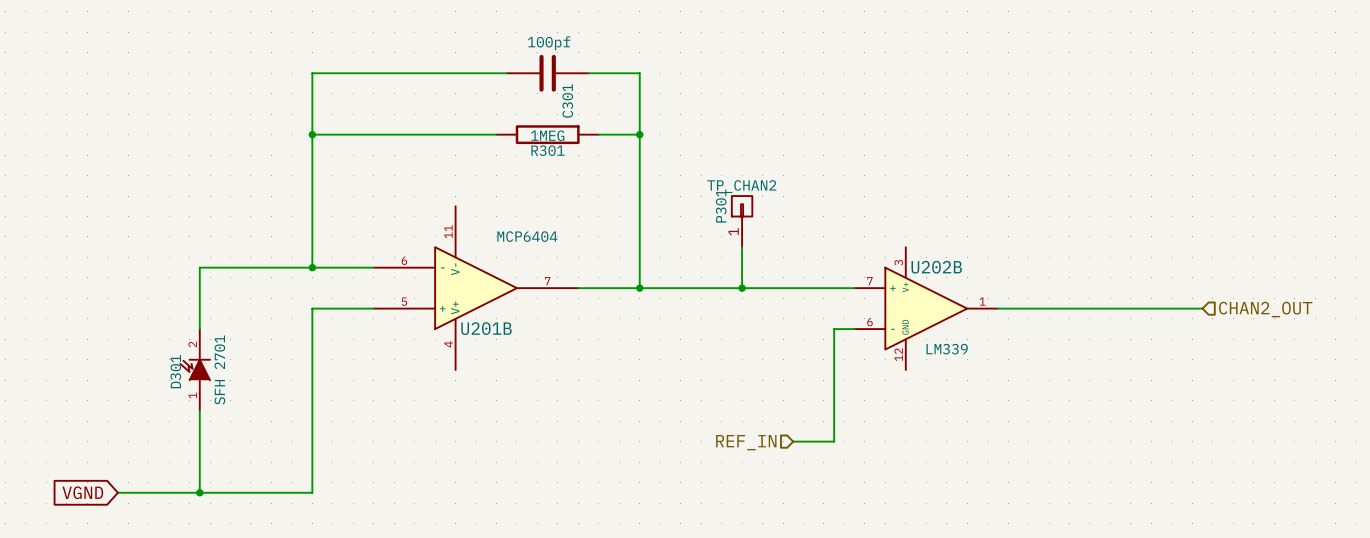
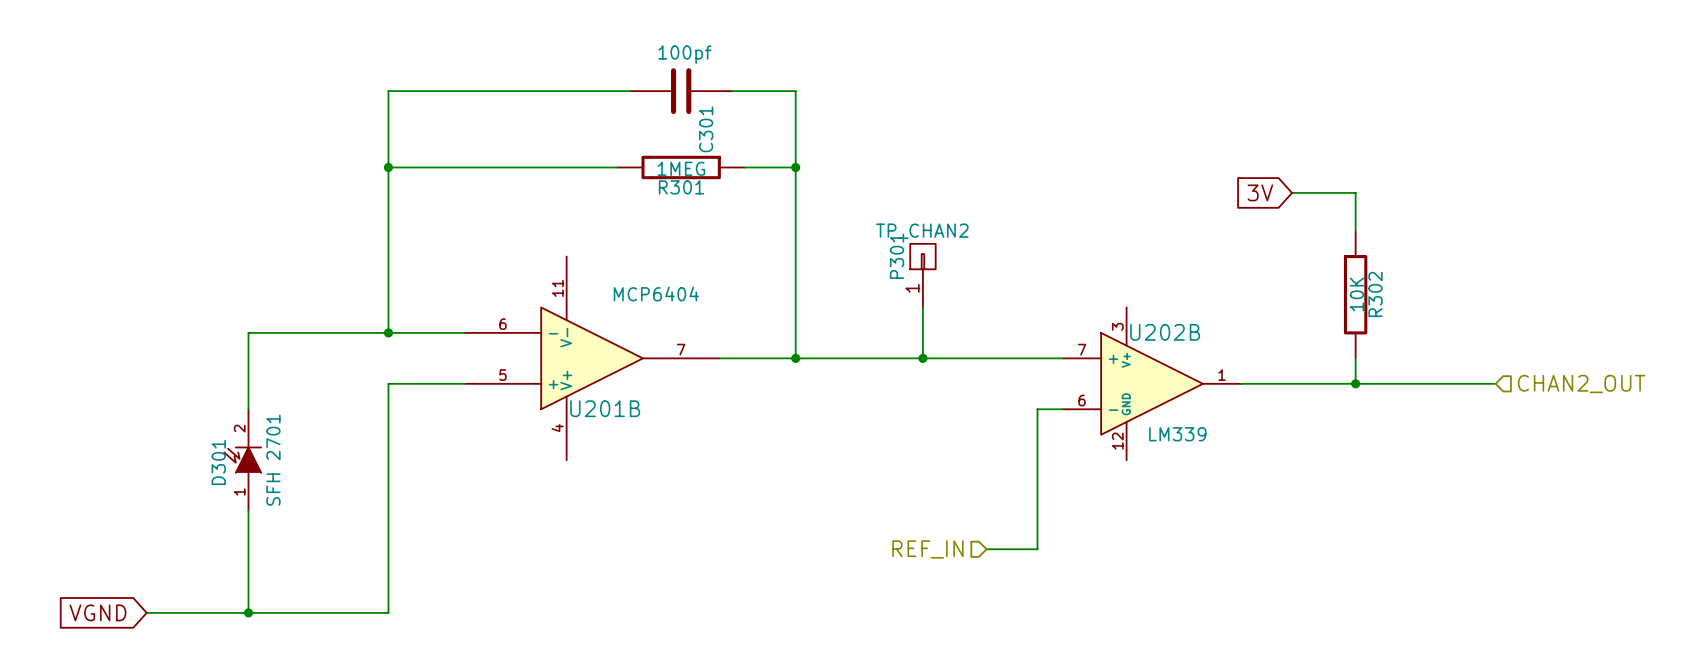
global label: none -> 3V (1260, 192)
wire: none -> (1292, 192) (1355, 192) (1355, 231)
R302: none -> 10K (1355, 294)
wire: none -> (1355, 358) (1355, 383)
junction: none -> (1355, 383)

